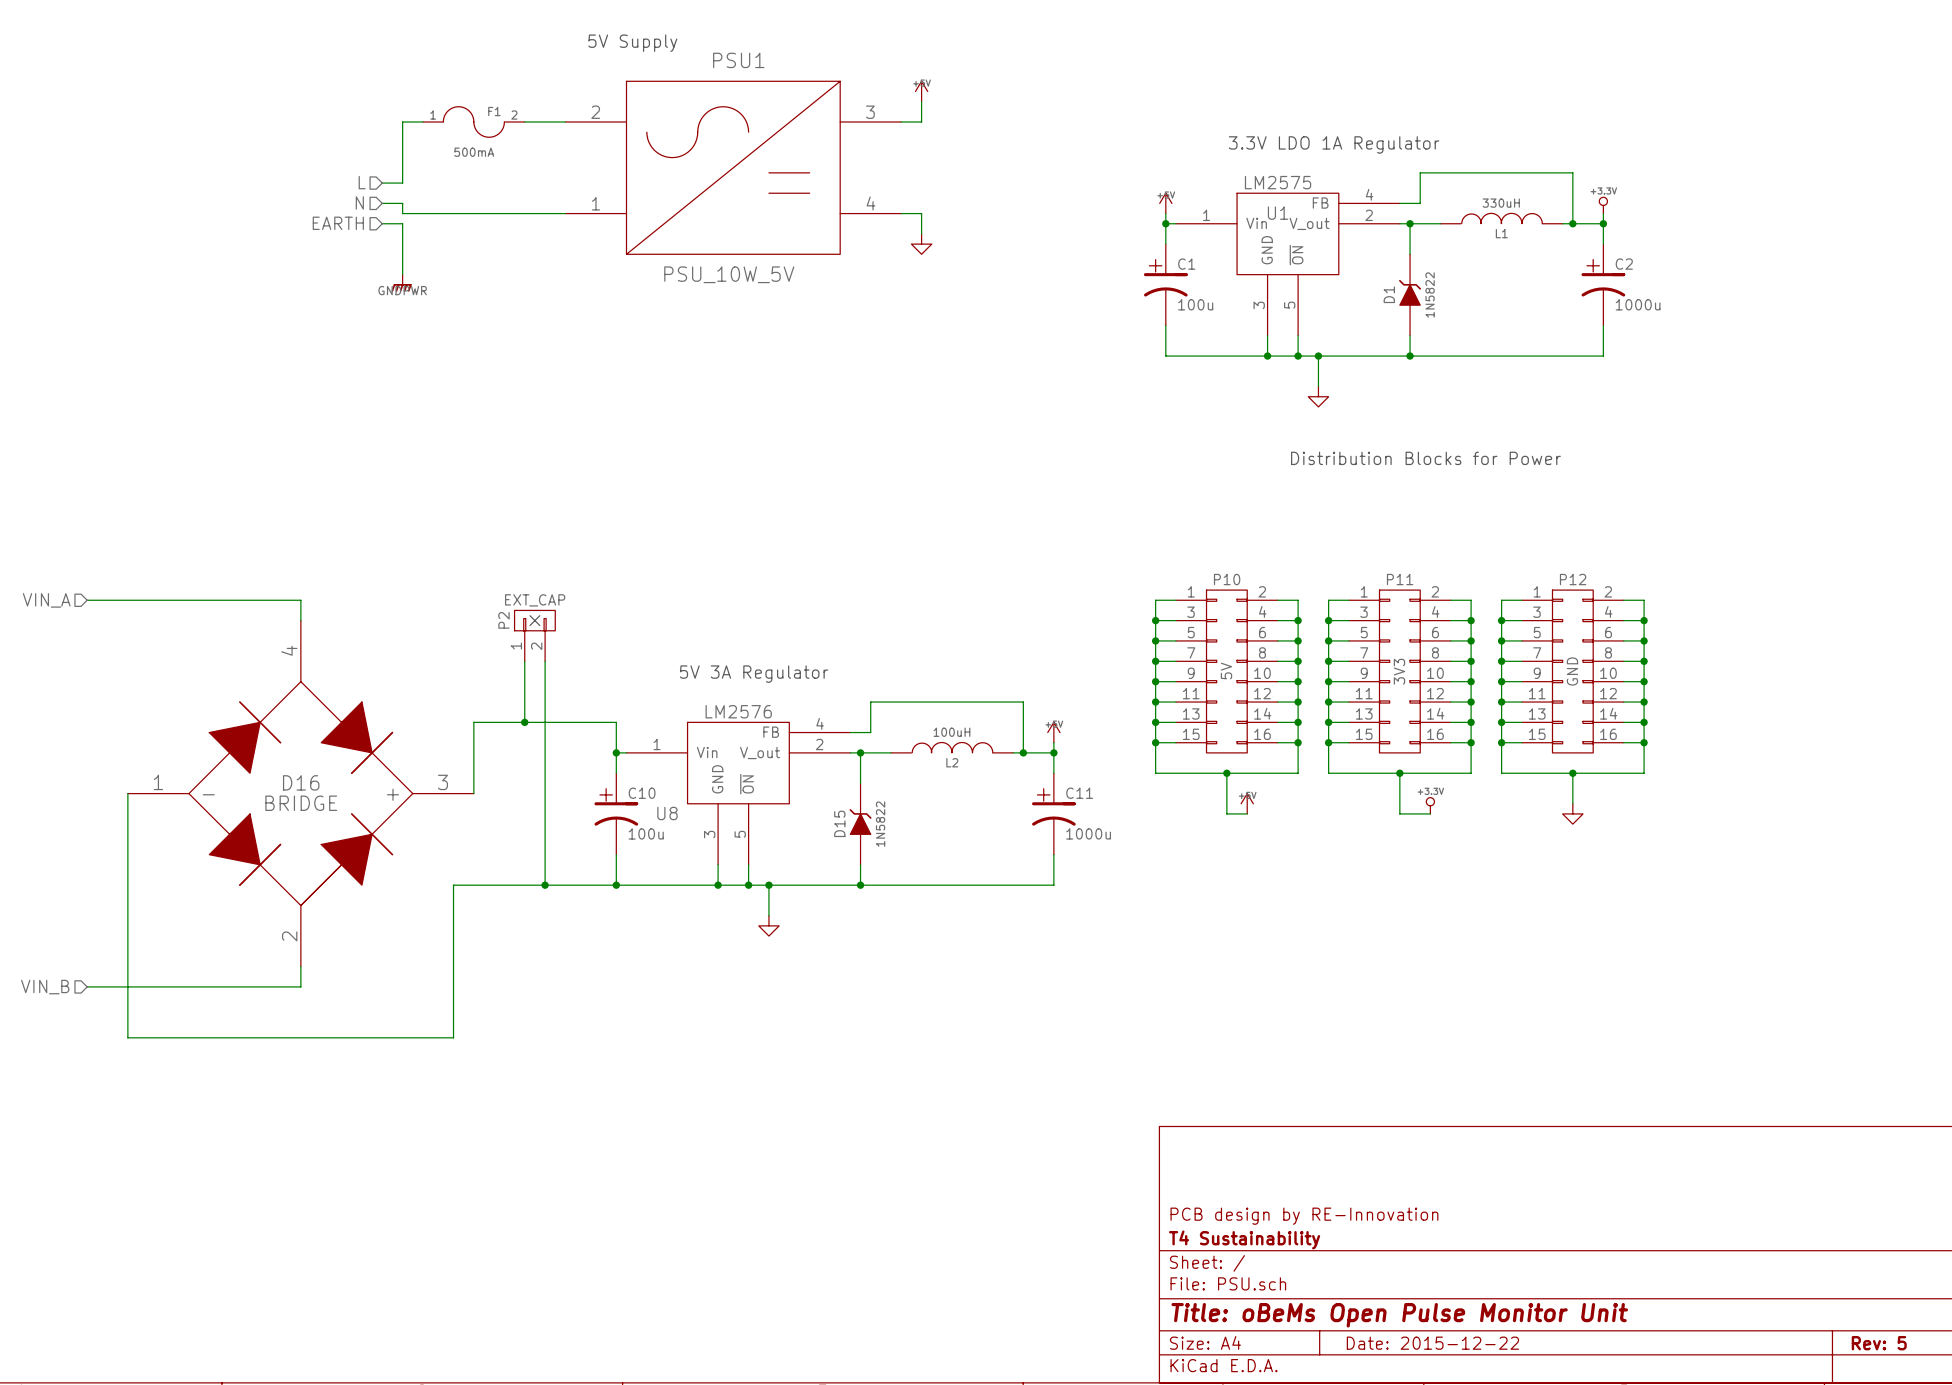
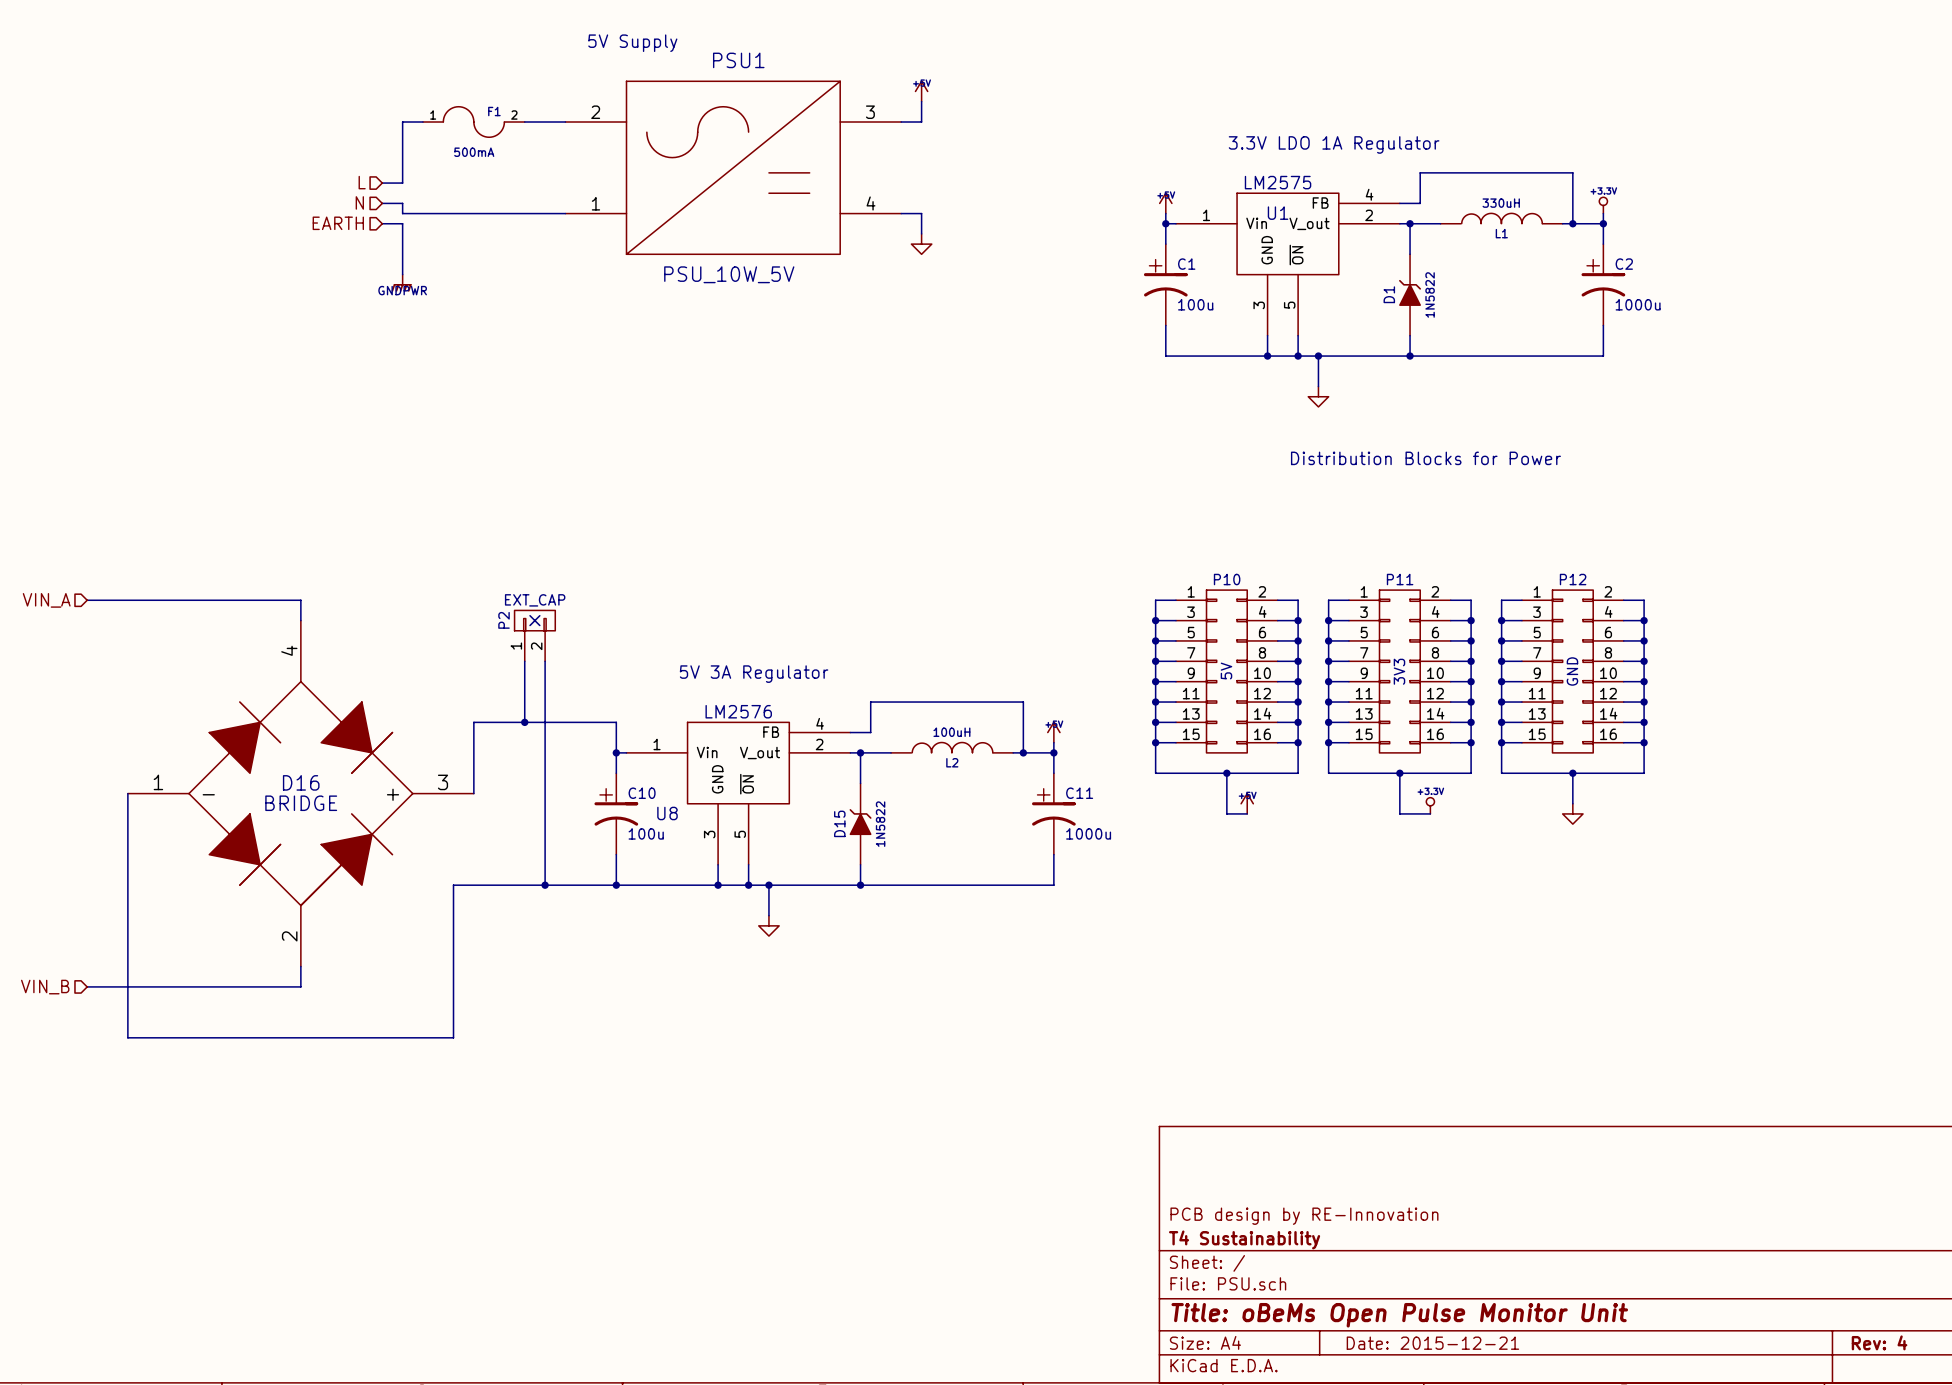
title block: Date: 2015-12-22 (1432, 1343) -> Date: 2015-12-21 (1432, 1343)
title block: Rev: 5 (1879, 1343) -> Rev: 4 (1879, 1342)

